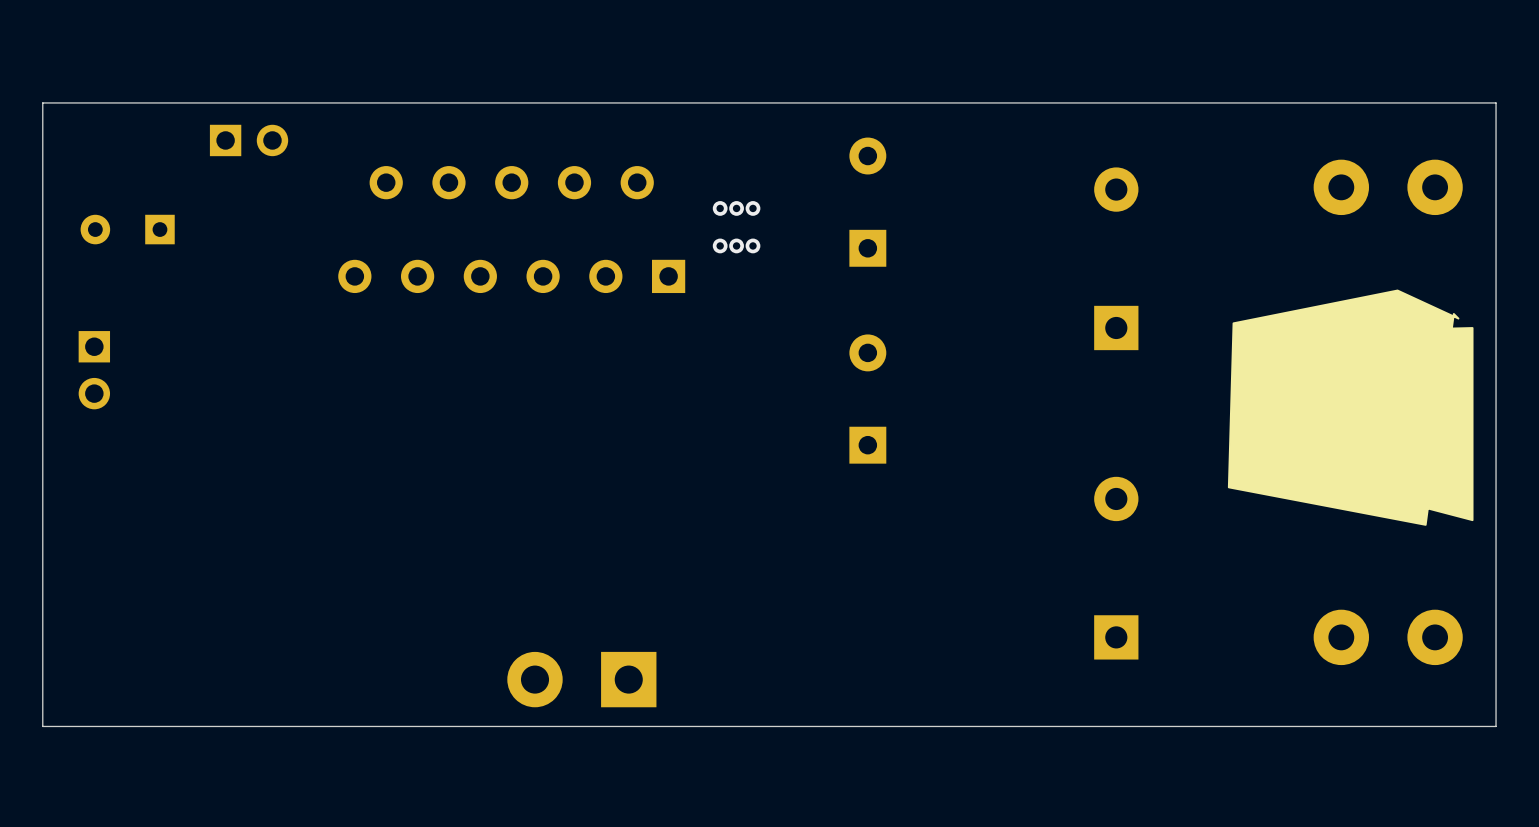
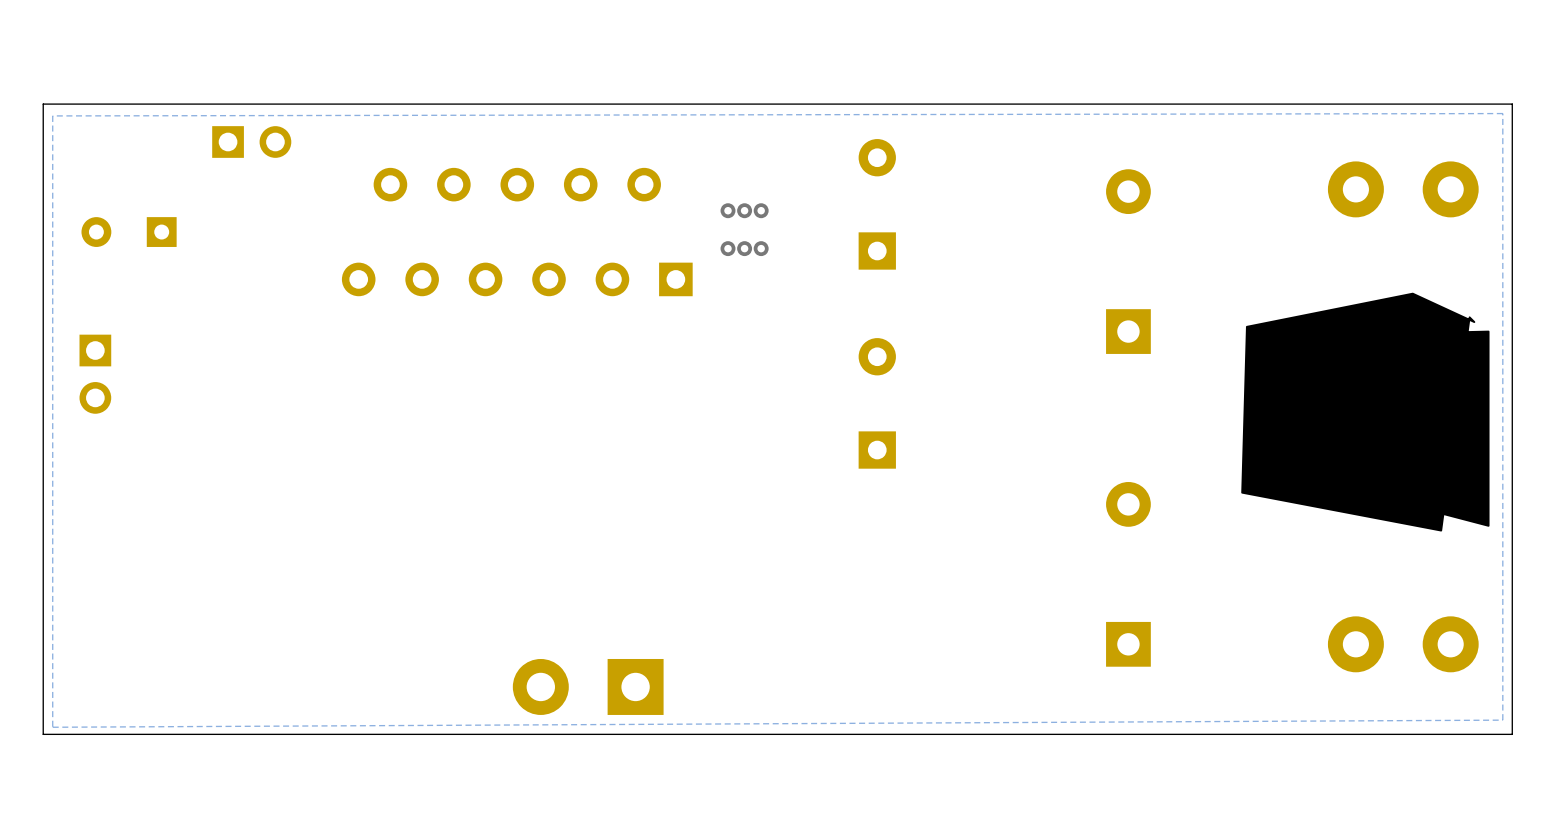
zone outline: none -> (1502, 113) (52, 115) (52, 727) (1502, 720) (1502, 113)

